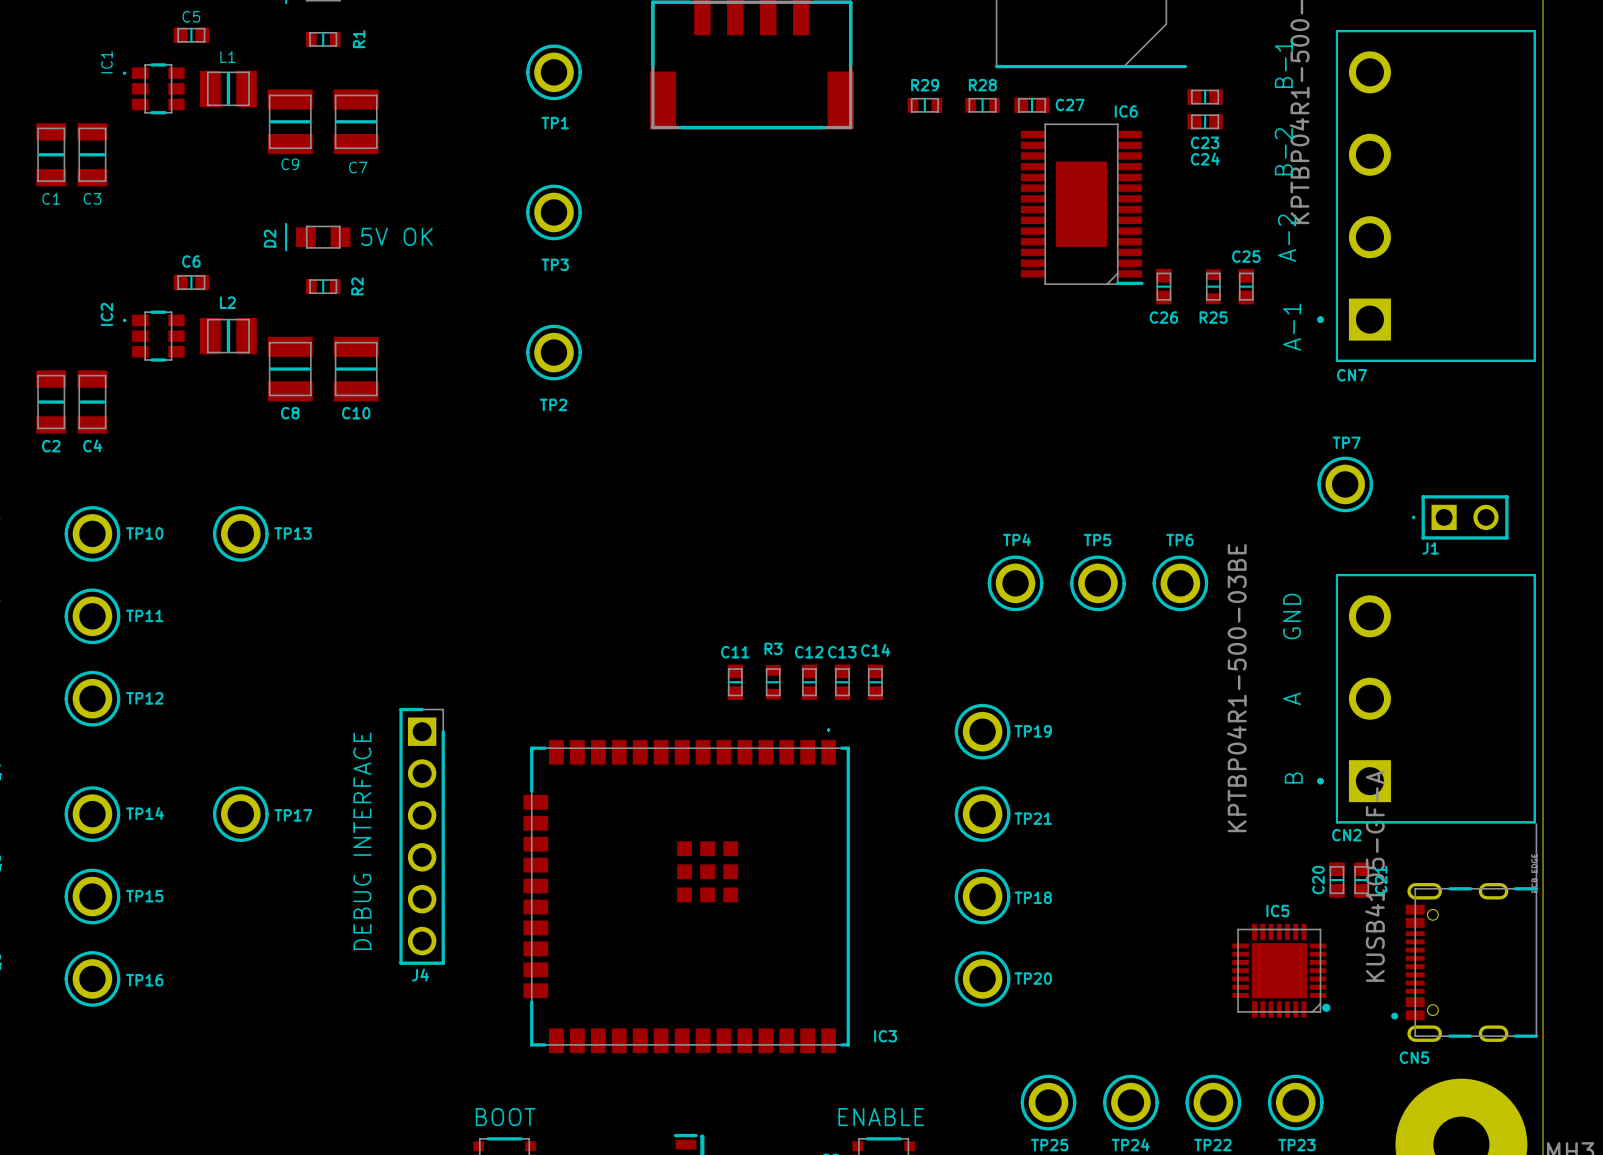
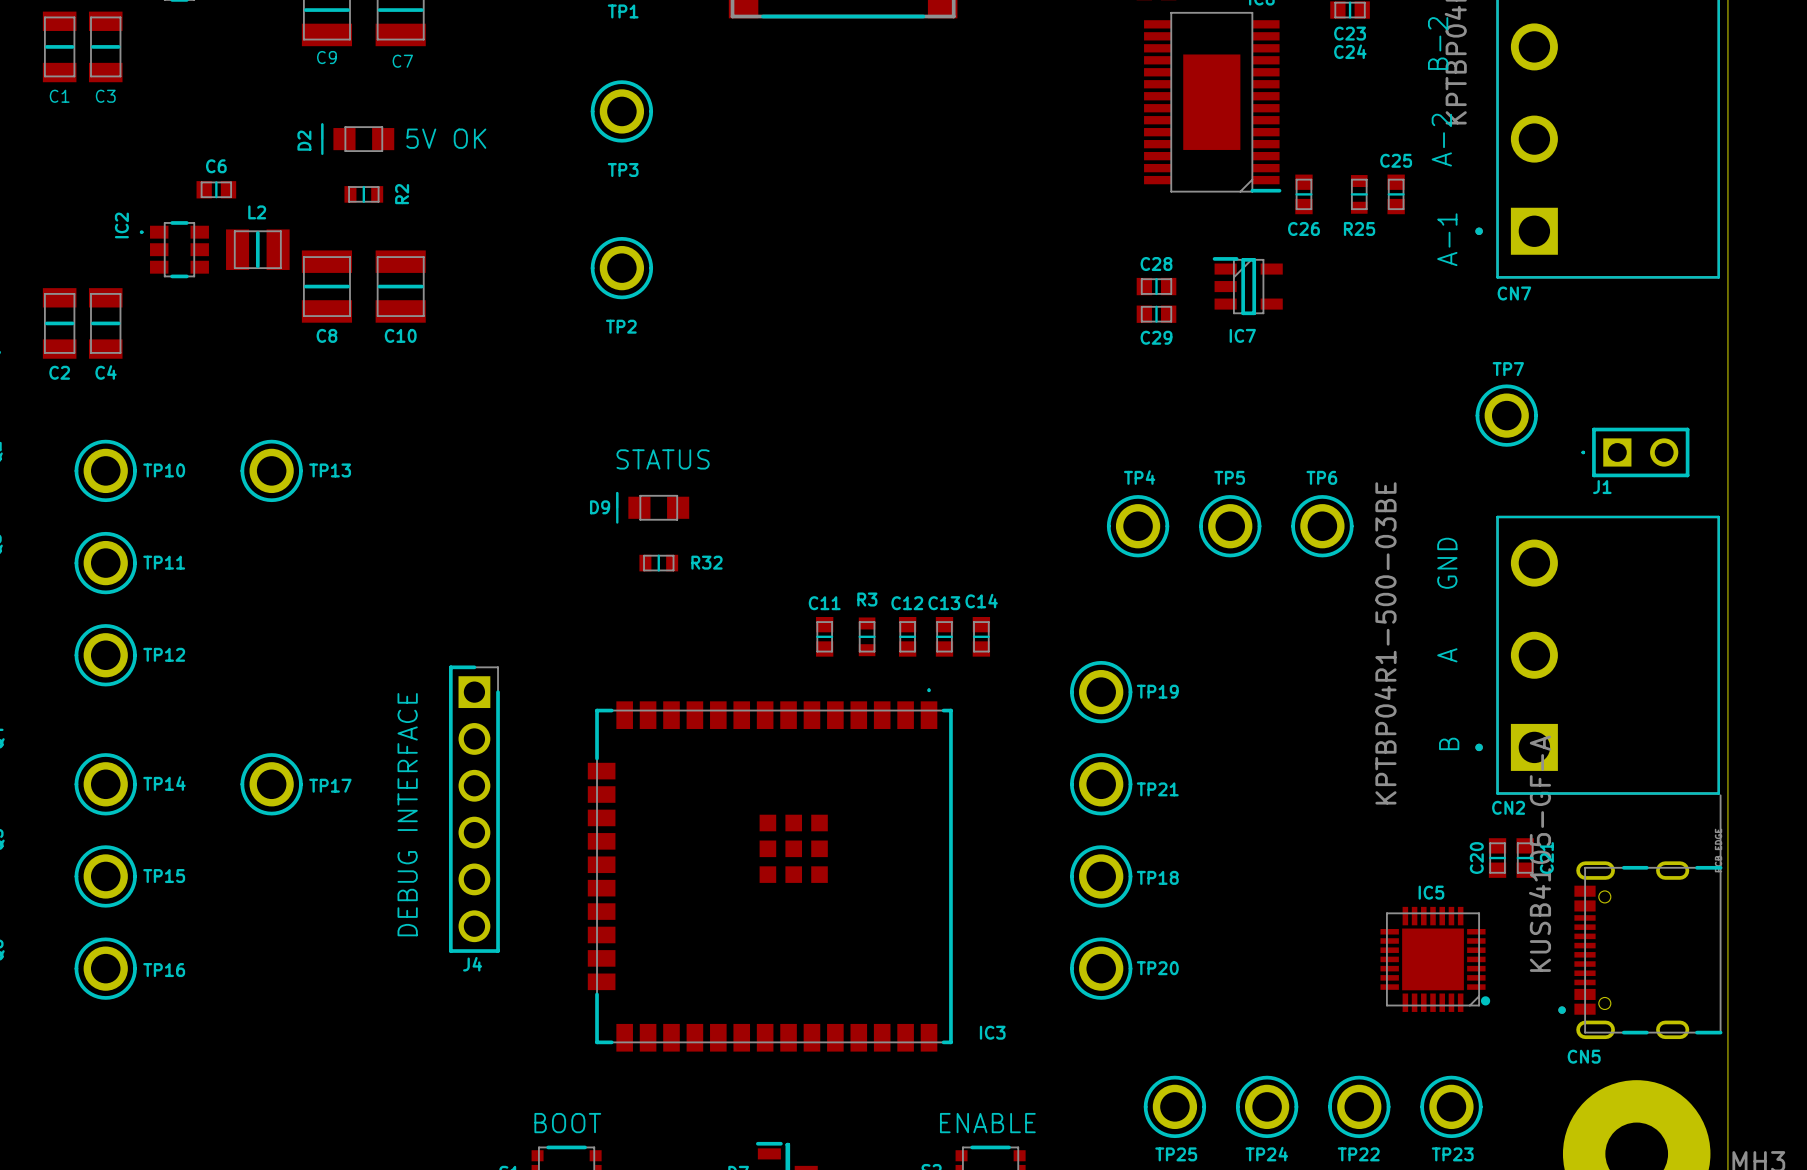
IC7: none -> (1247, 286)
C28: none -> (1156, 286)
C29: none -> (1156, 314)
text: none -> STATUS (663, 459)
D9: none -> (652, 507)
R32: none -> (658, 563)

